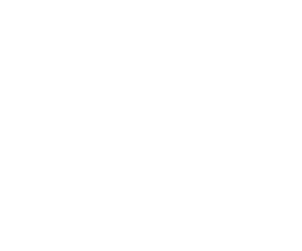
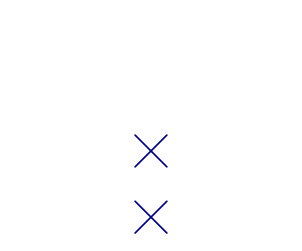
no-connect mark: none -> (150, 150)
no-connect mark: none -> (150, 217)

